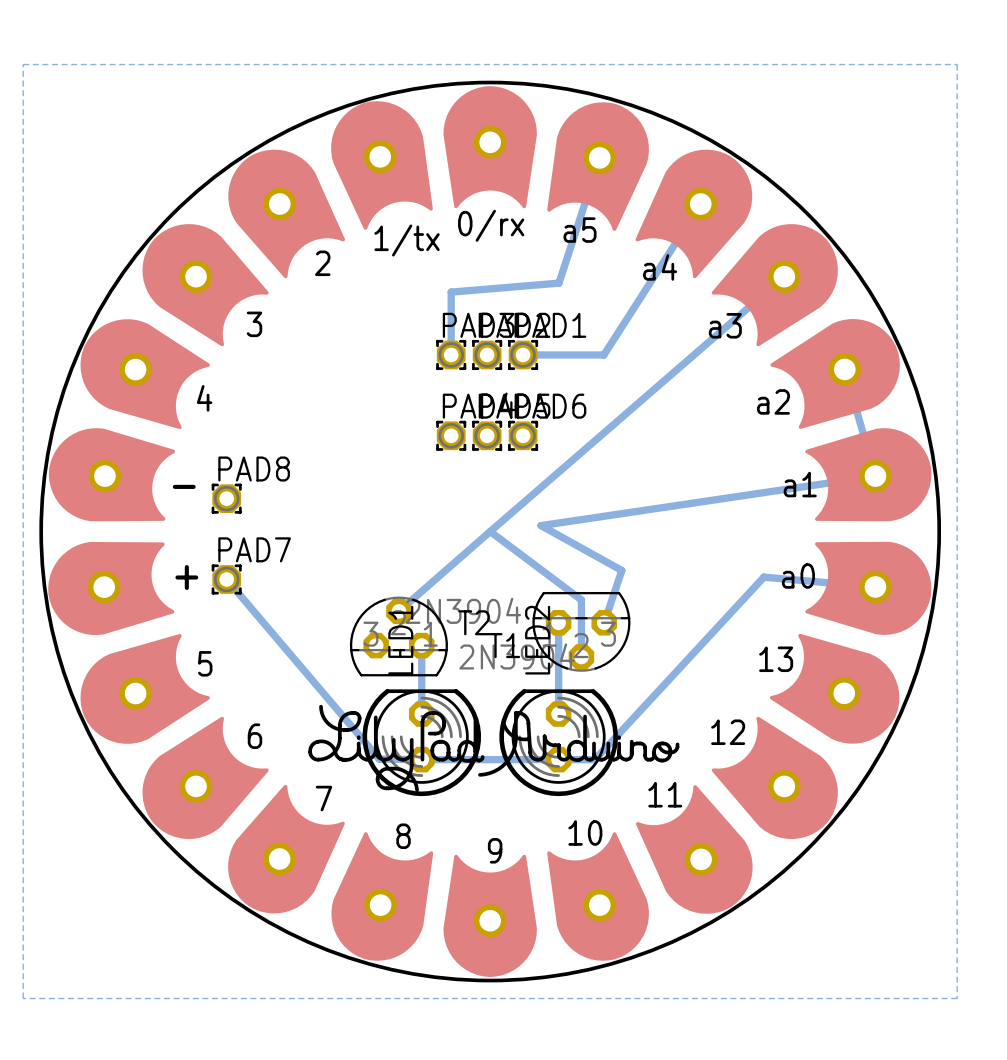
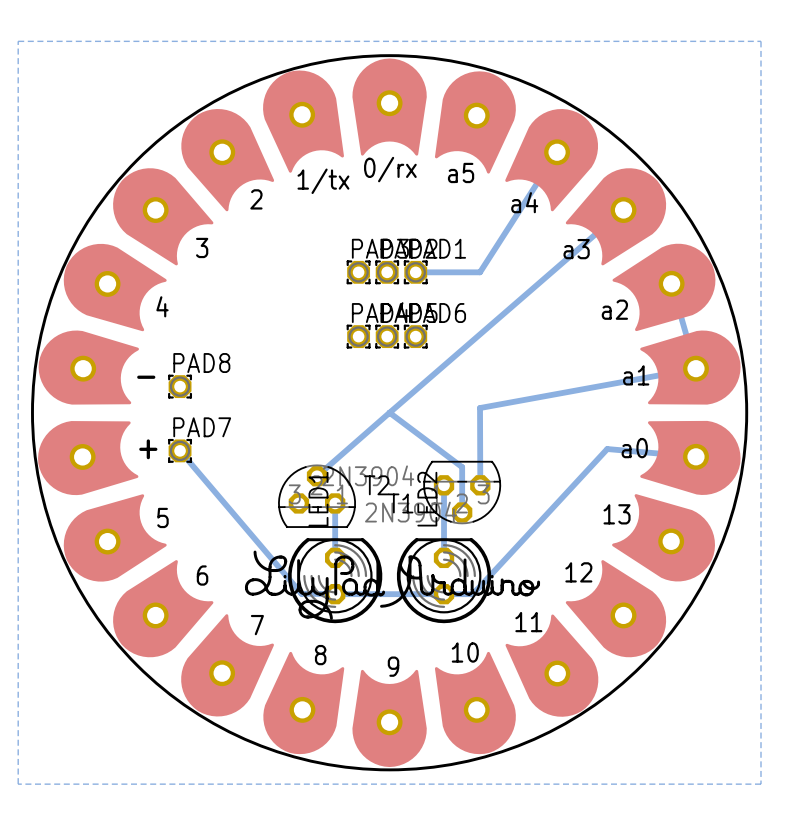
bottom track: (599, 157) (558, 283) (451, 292) (451, 354) -> none
bottom track: (875, 476) (541, 525) (621, 570) (604, 622) -> (696, 368) (480, 408) (480, 485)

